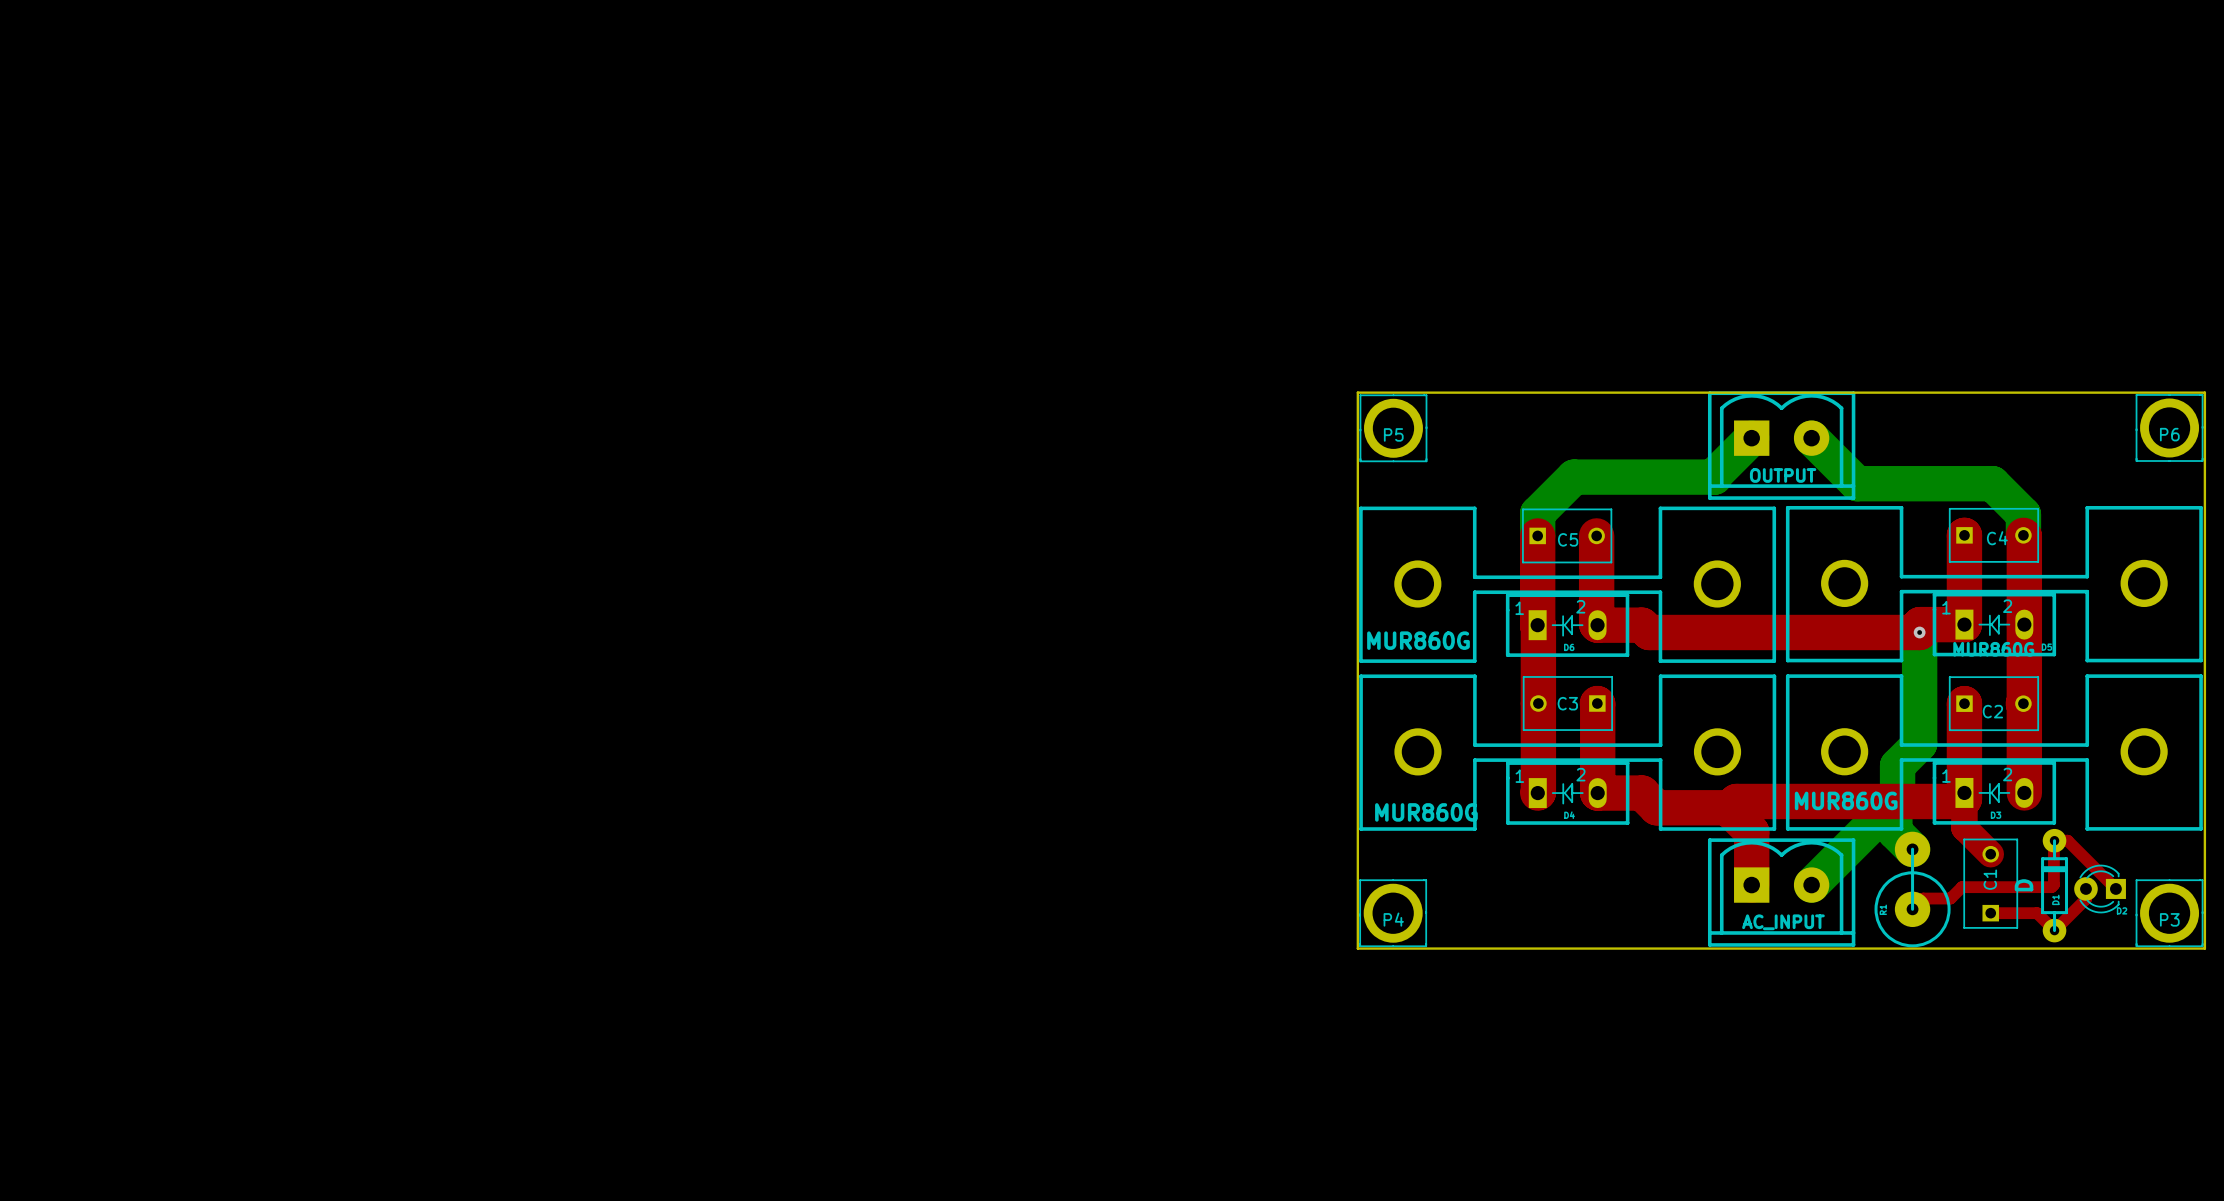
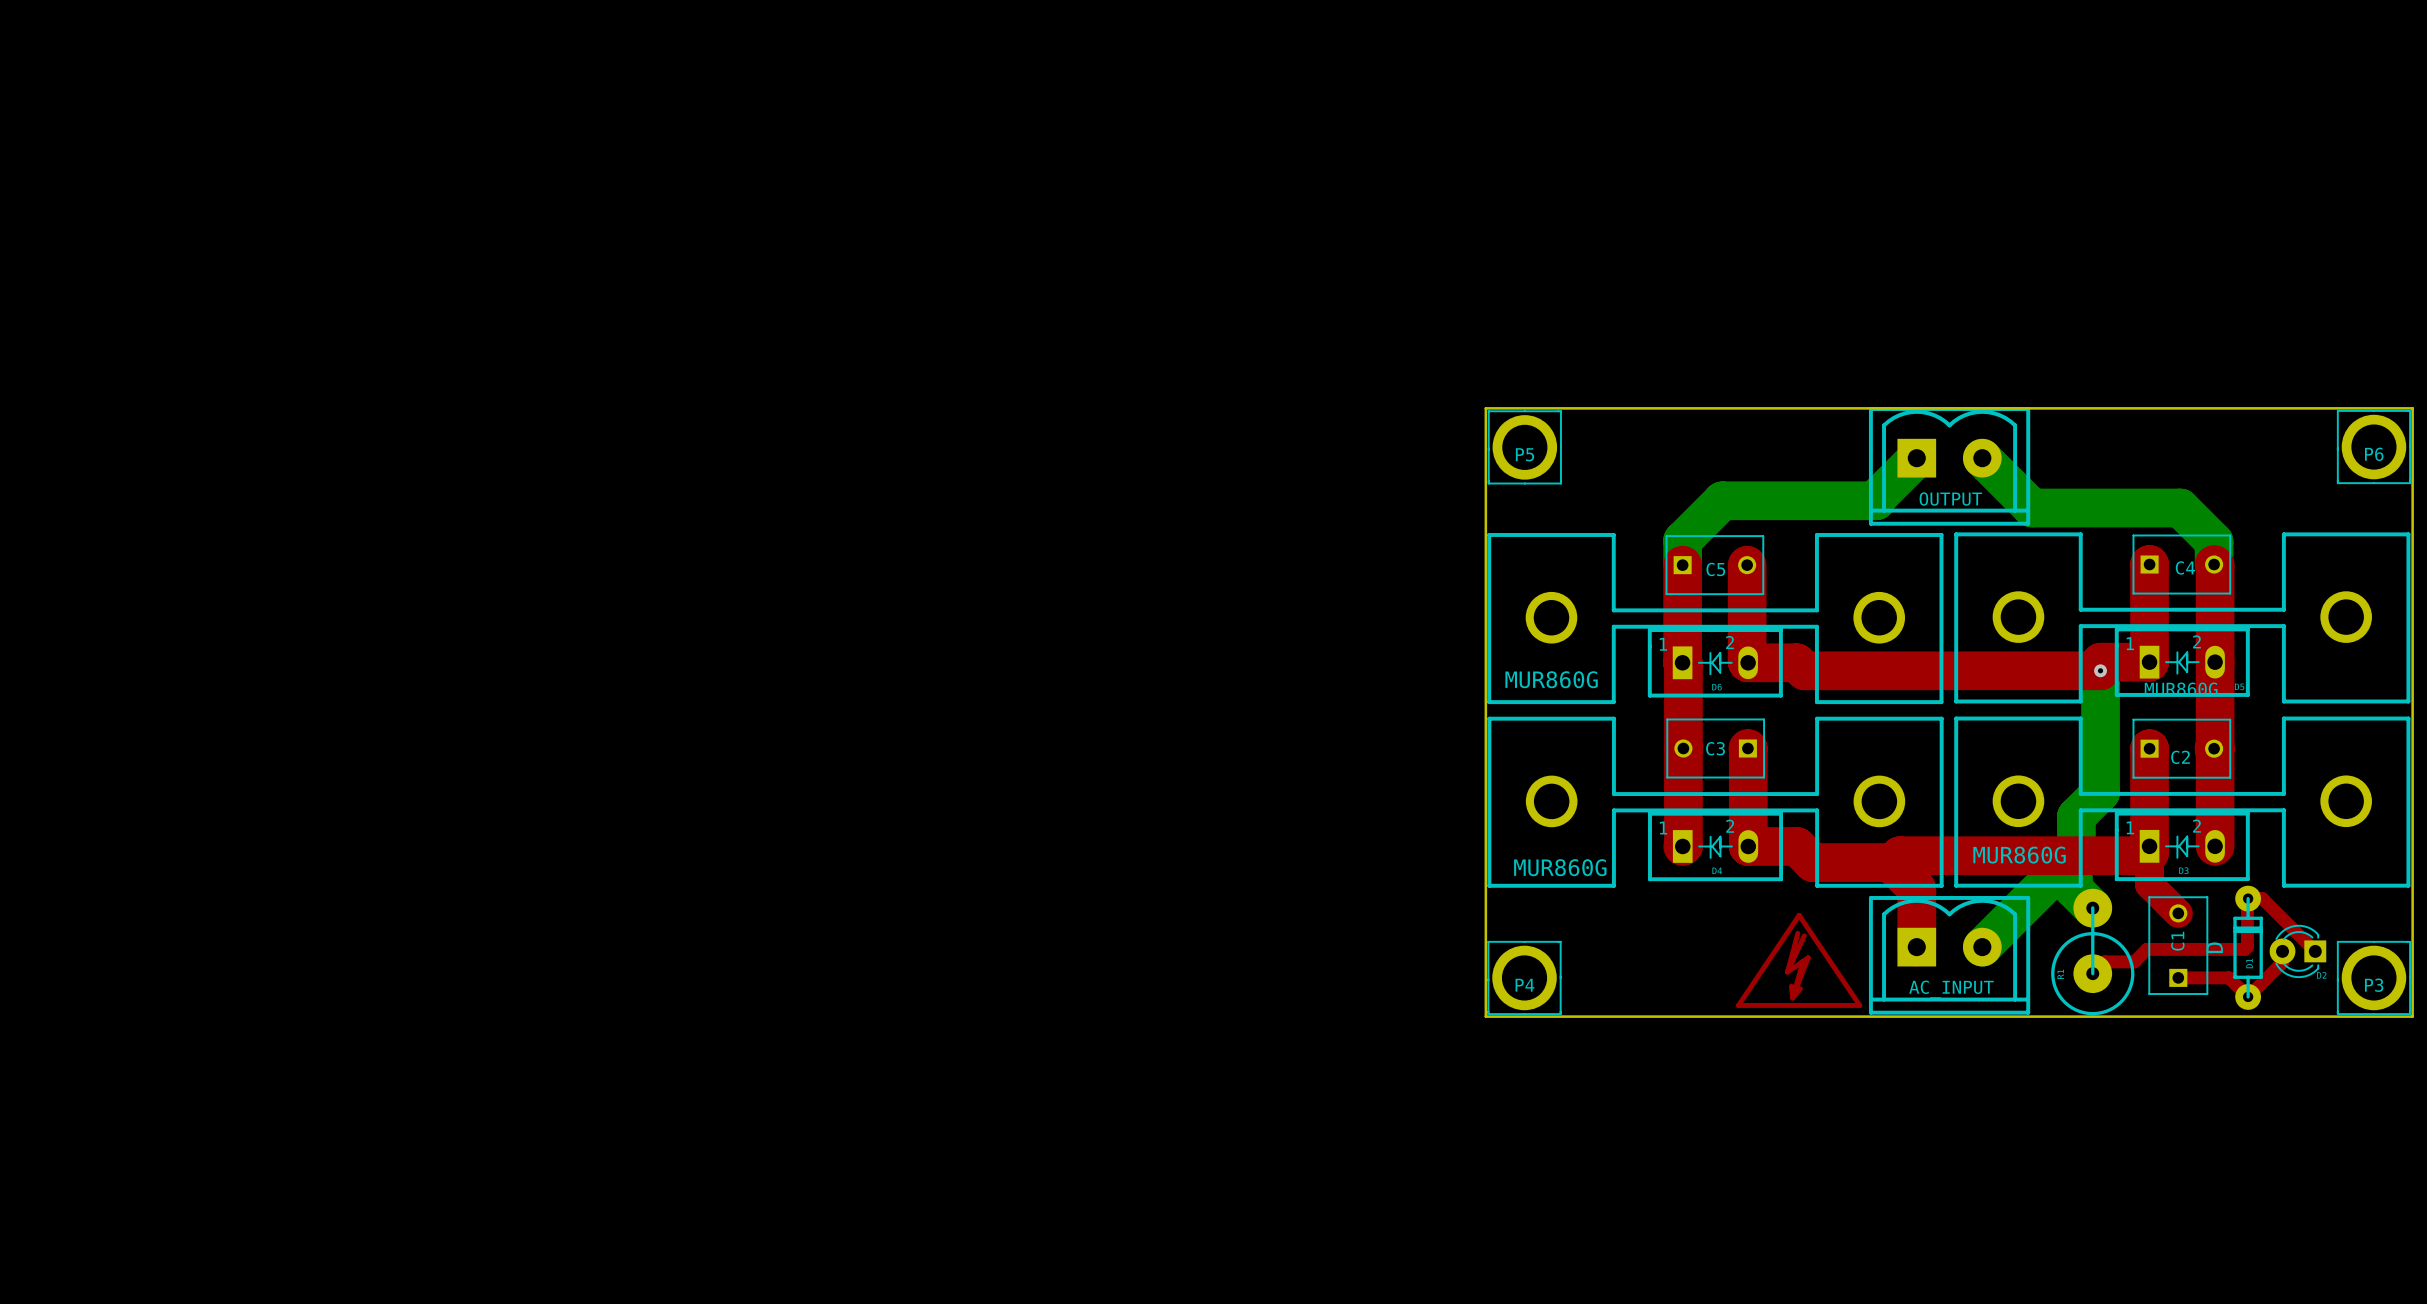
drawing: none -> [1736, 912, 1863, 1008]

